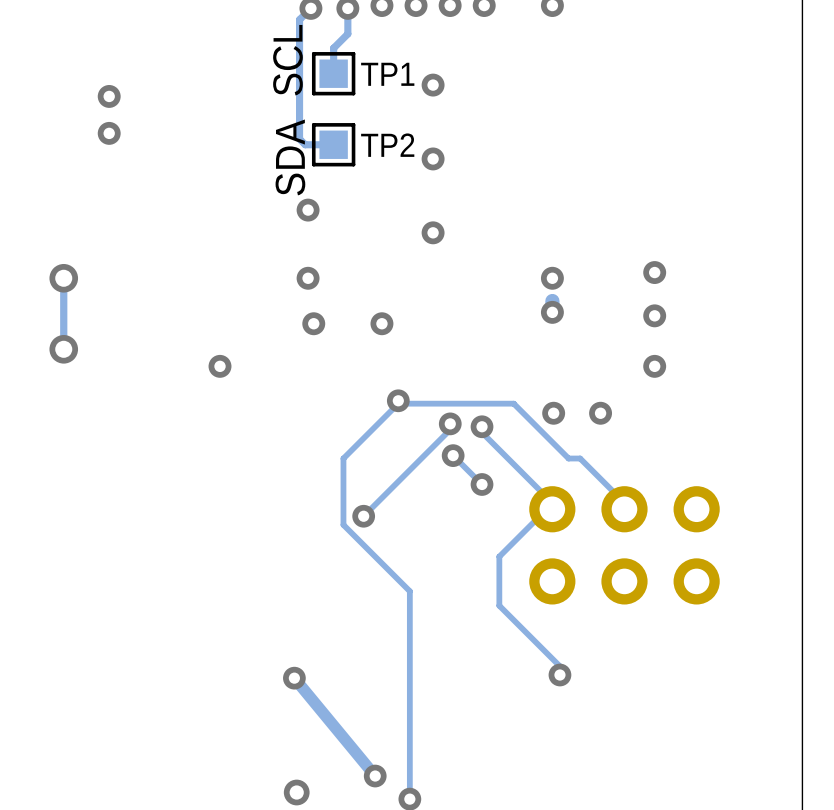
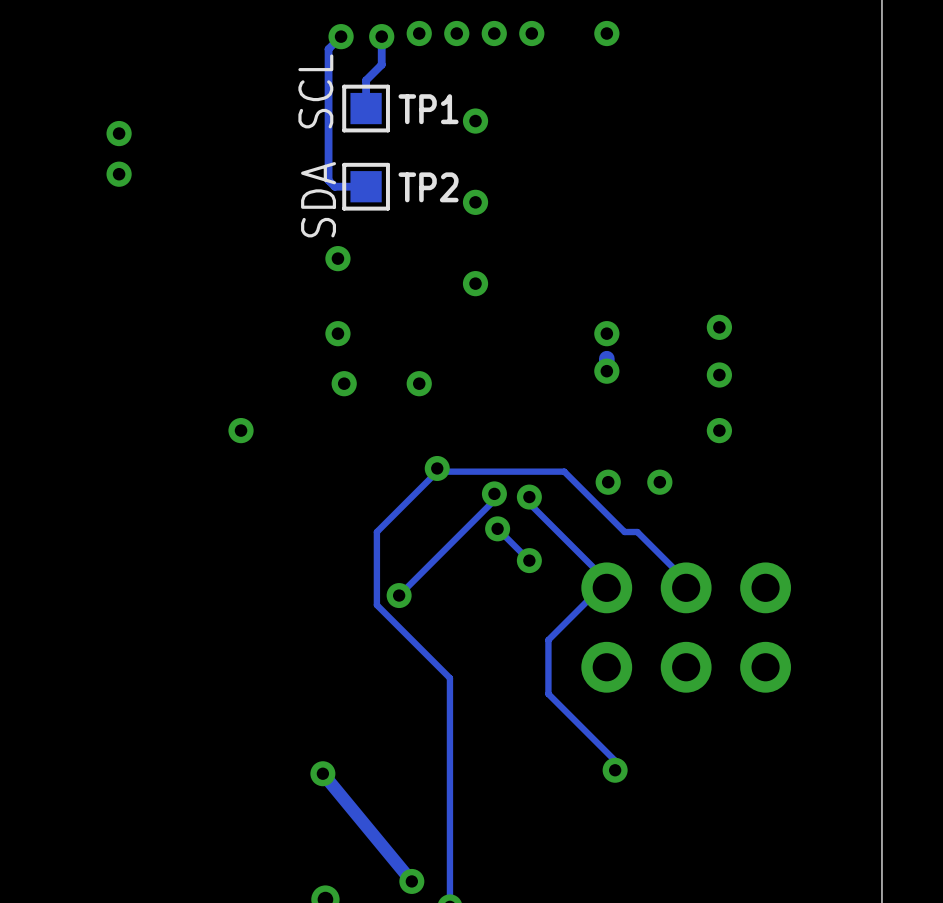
track: (63, 278) (63, 349) -> none
via: (63, 278) -> none
via: (63, 349) -> none

